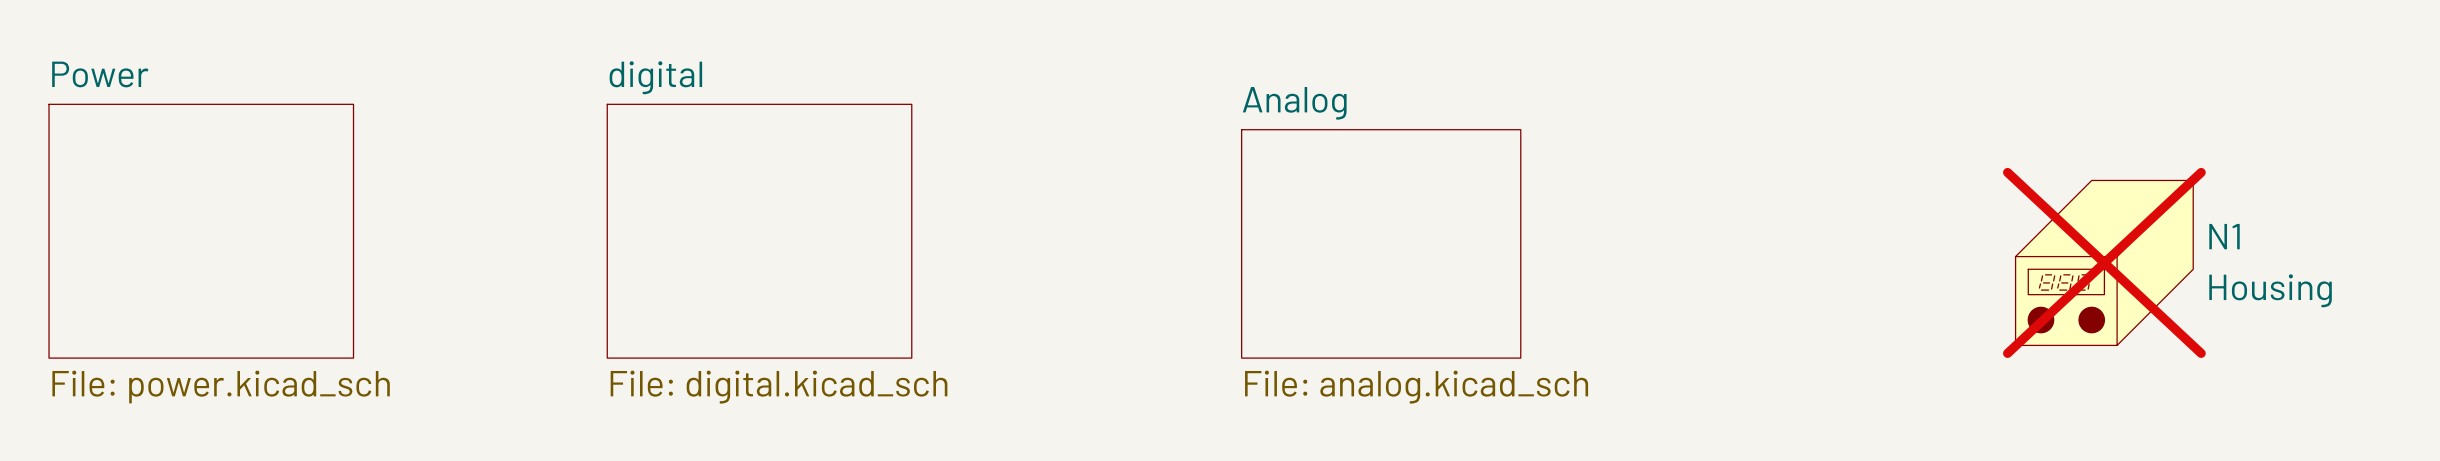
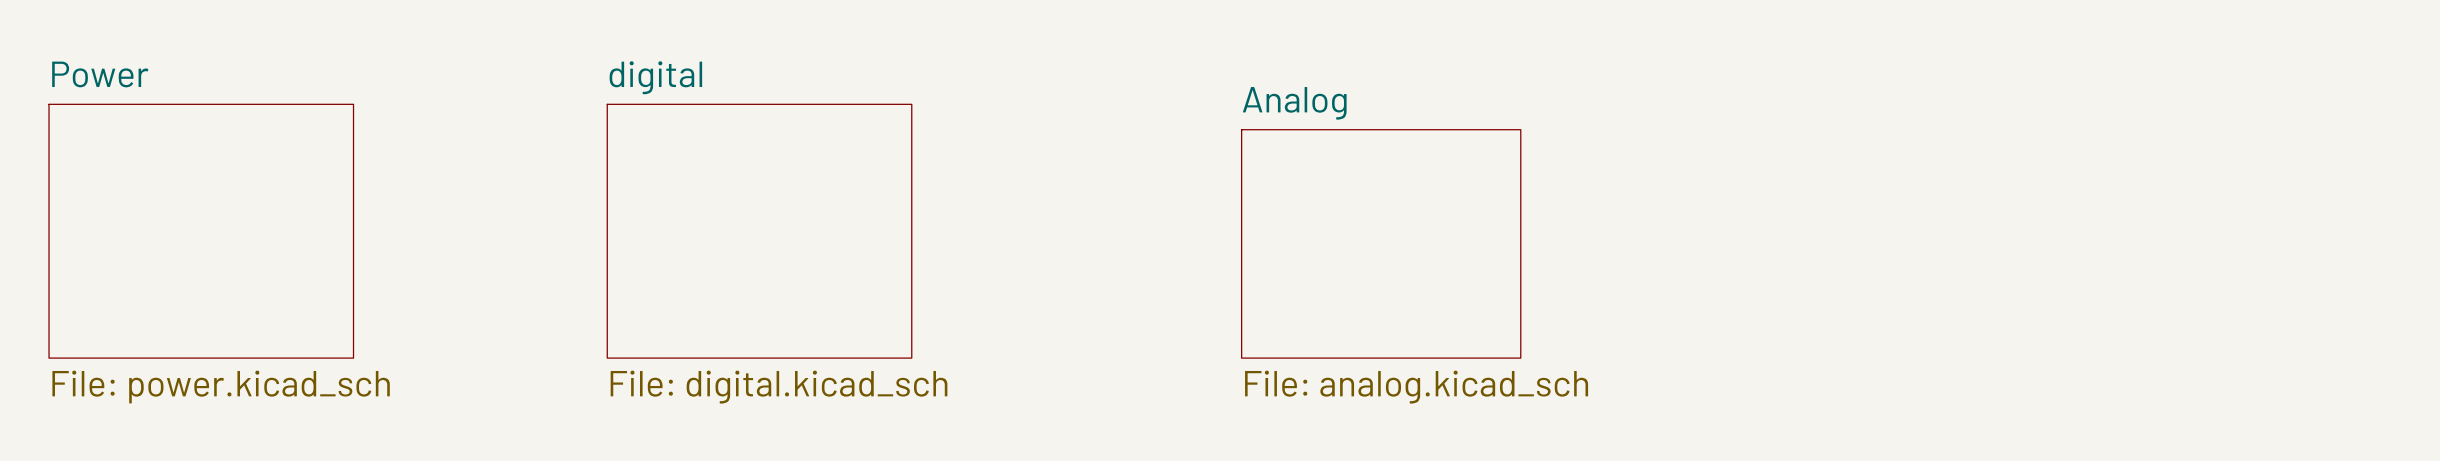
N1: Housing (2104, 262) -> none

